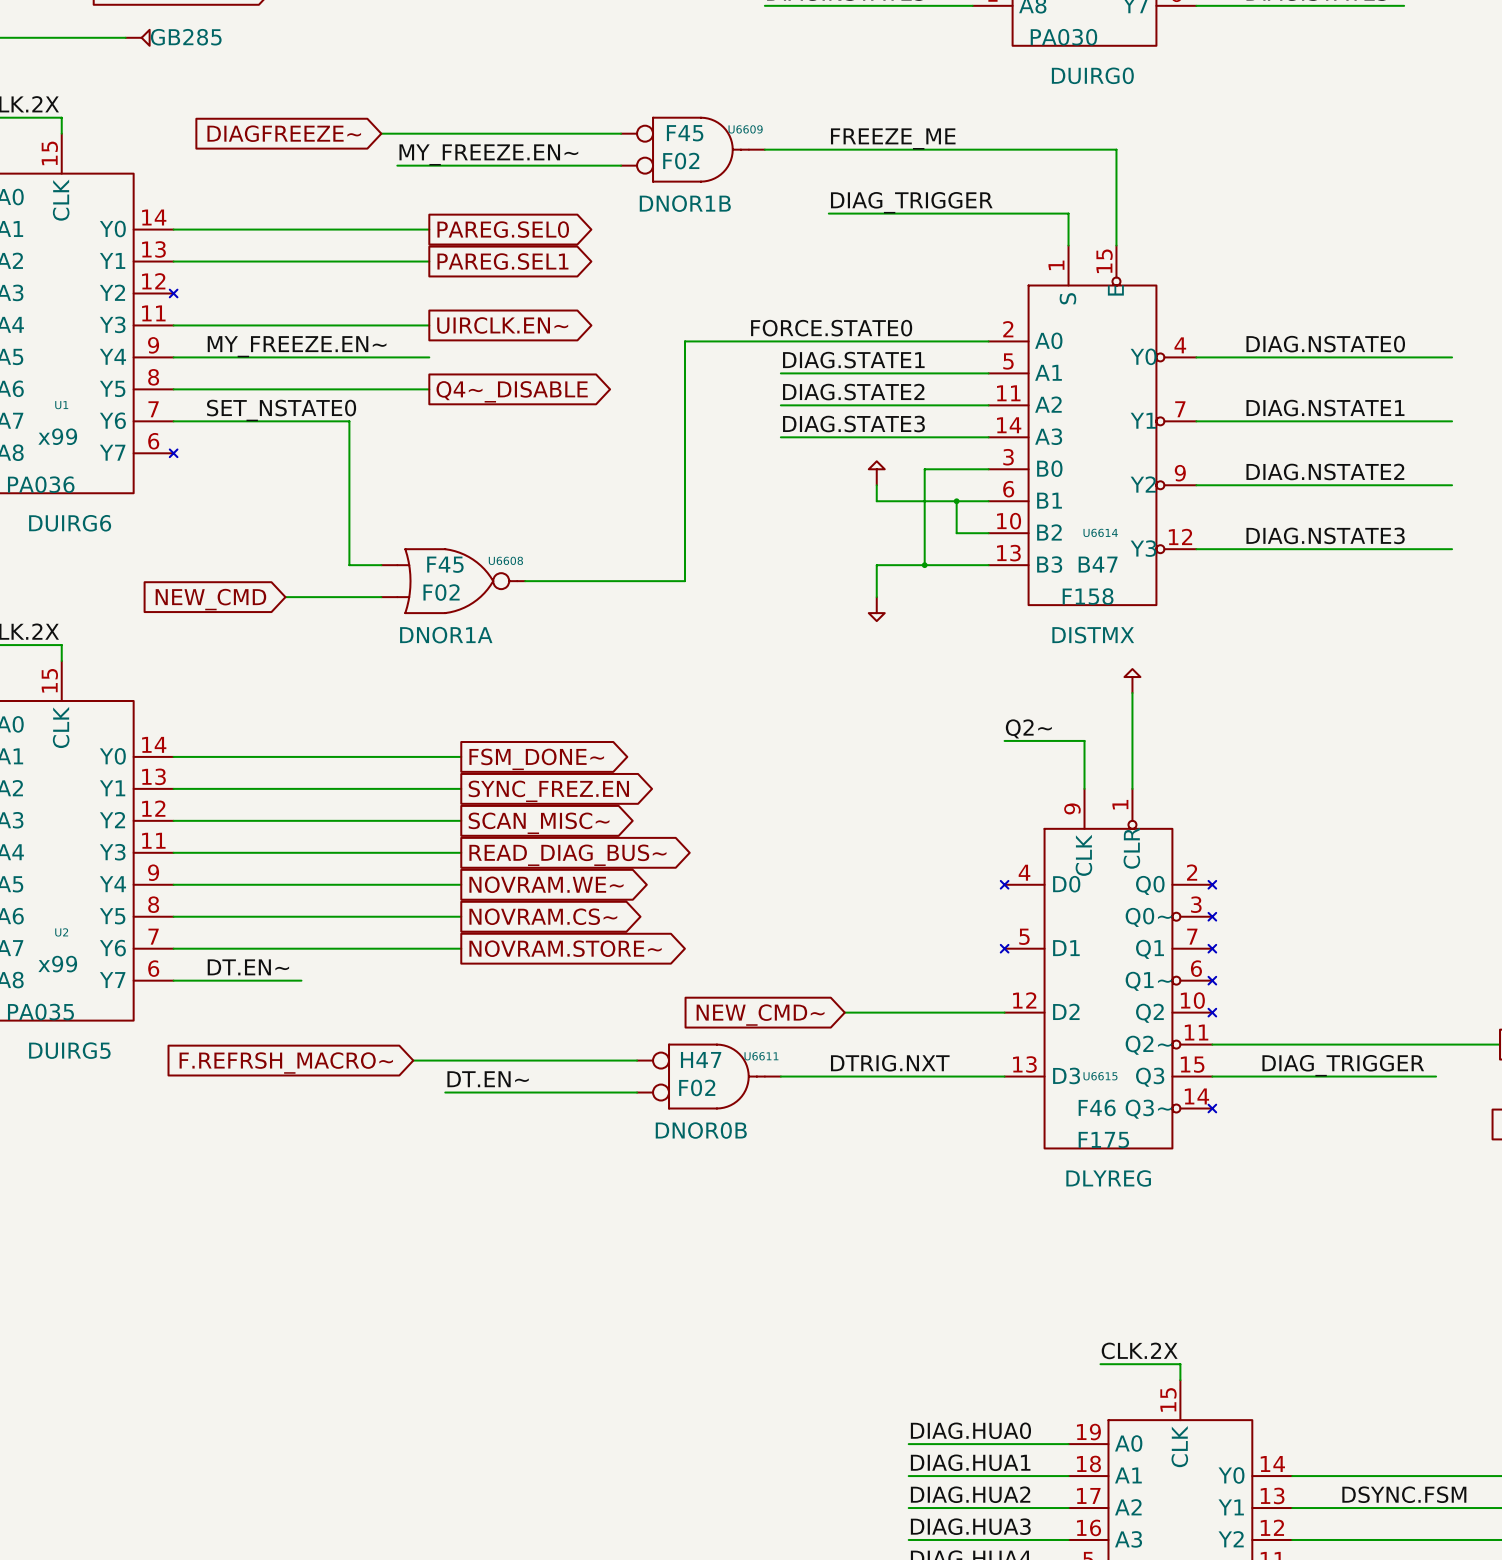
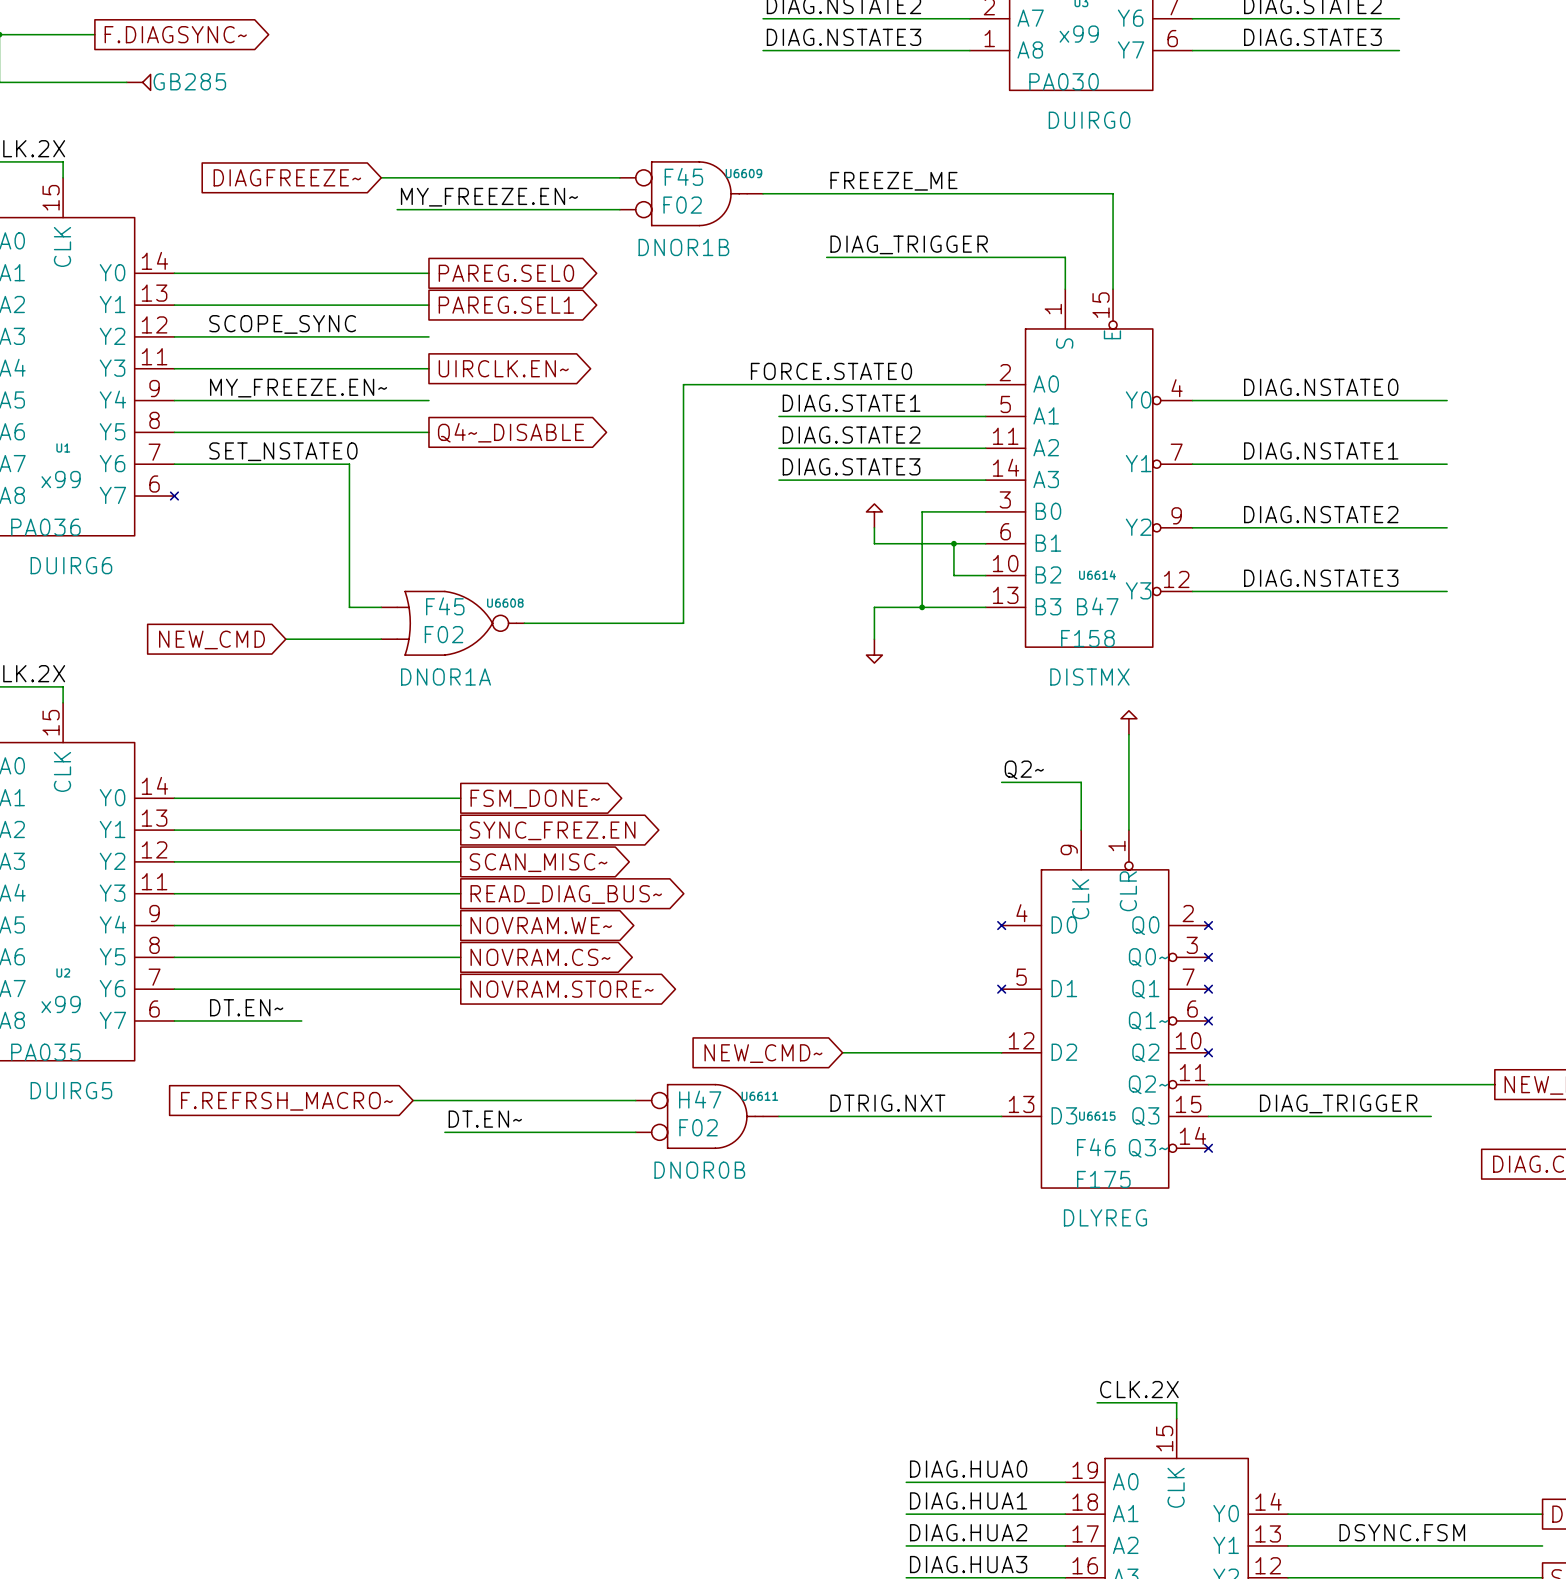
label: none -> SCOPE_SYNC (282, 324)
wire: none -> (174, 336) (428, 336)
no-connect mark: (173, 293) -> none

